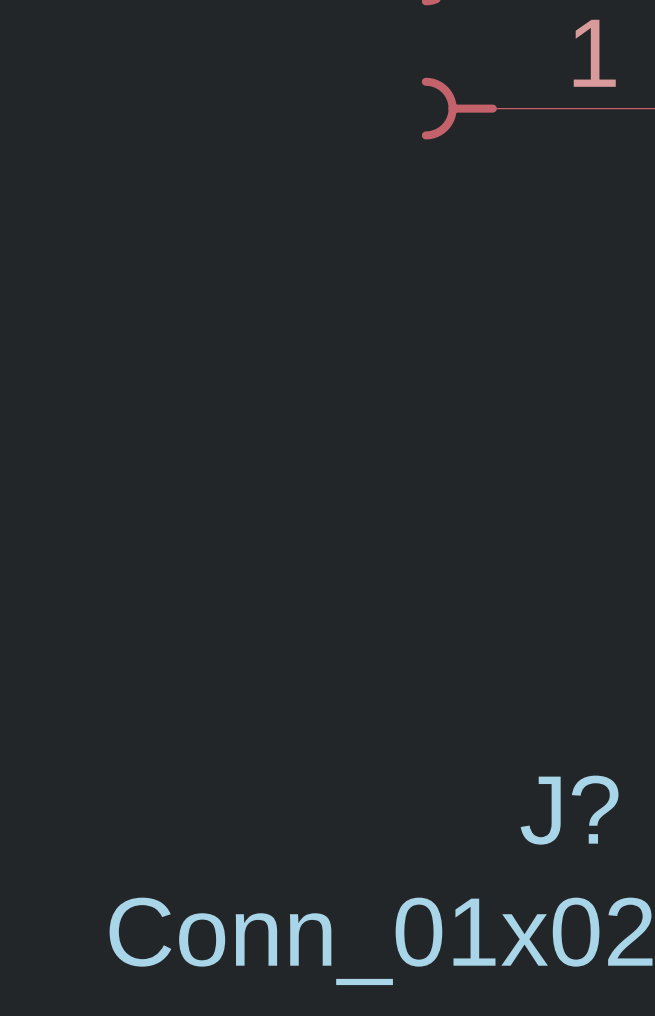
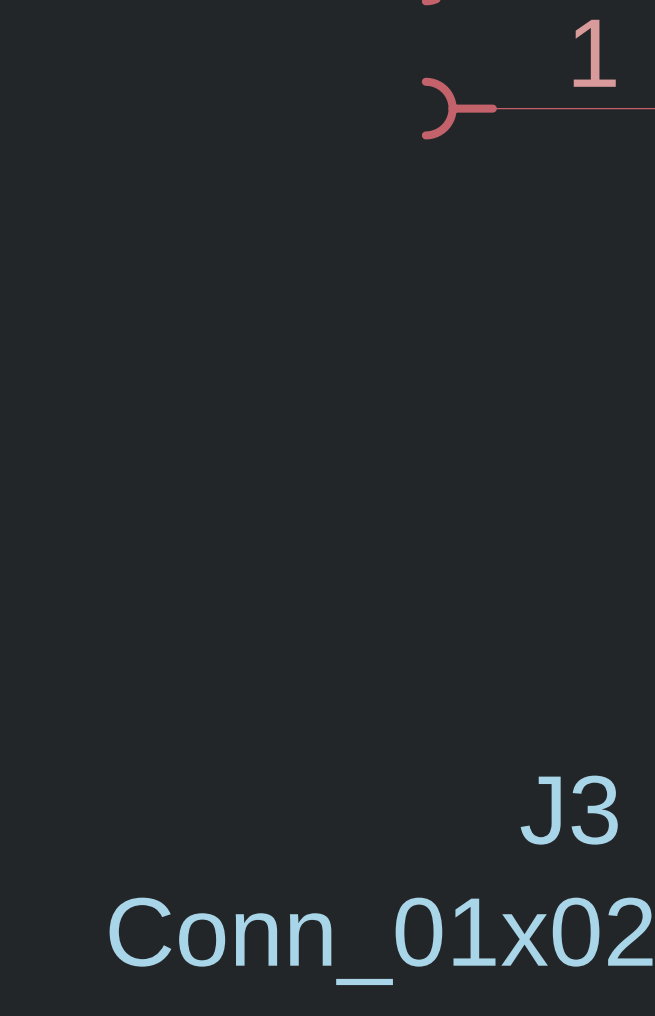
J? name: J? (569, 810) -> J3 (569, 810)

